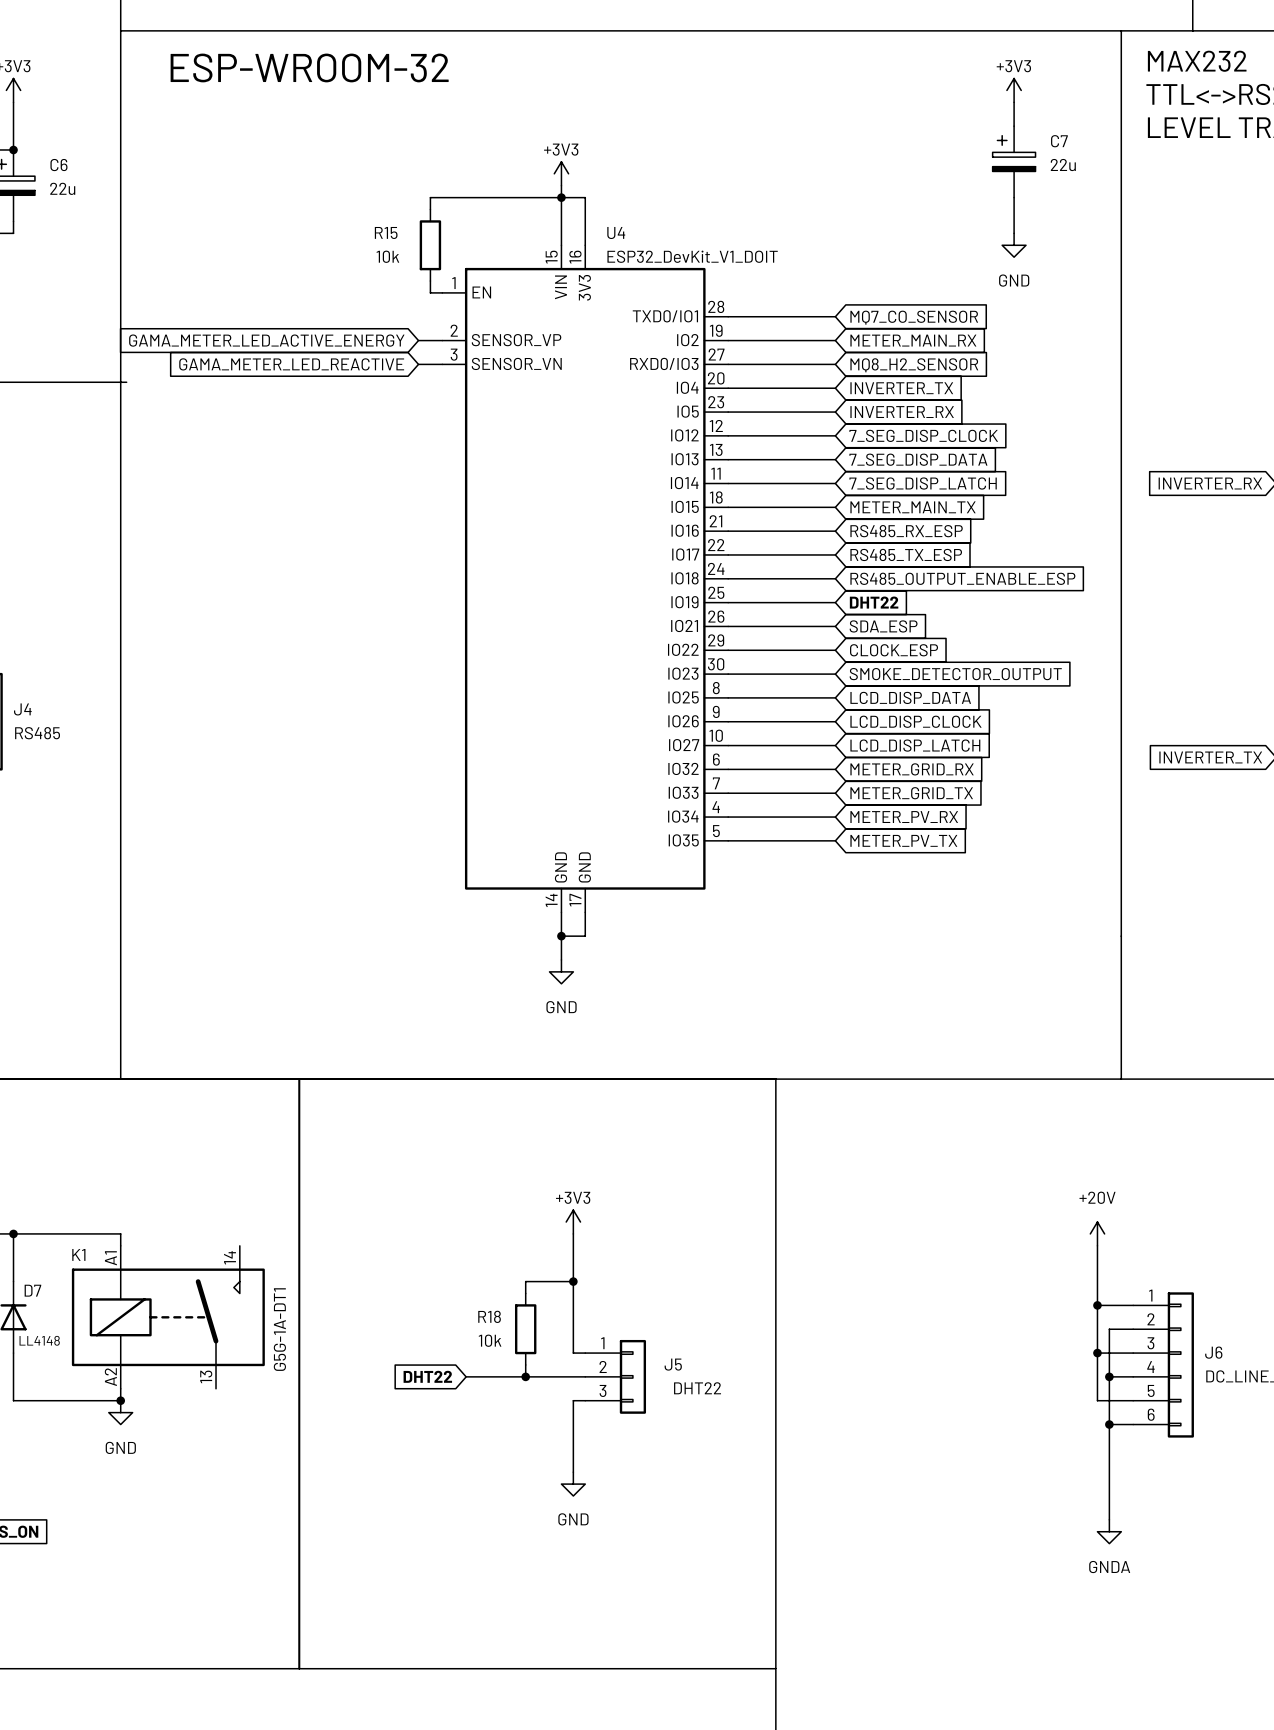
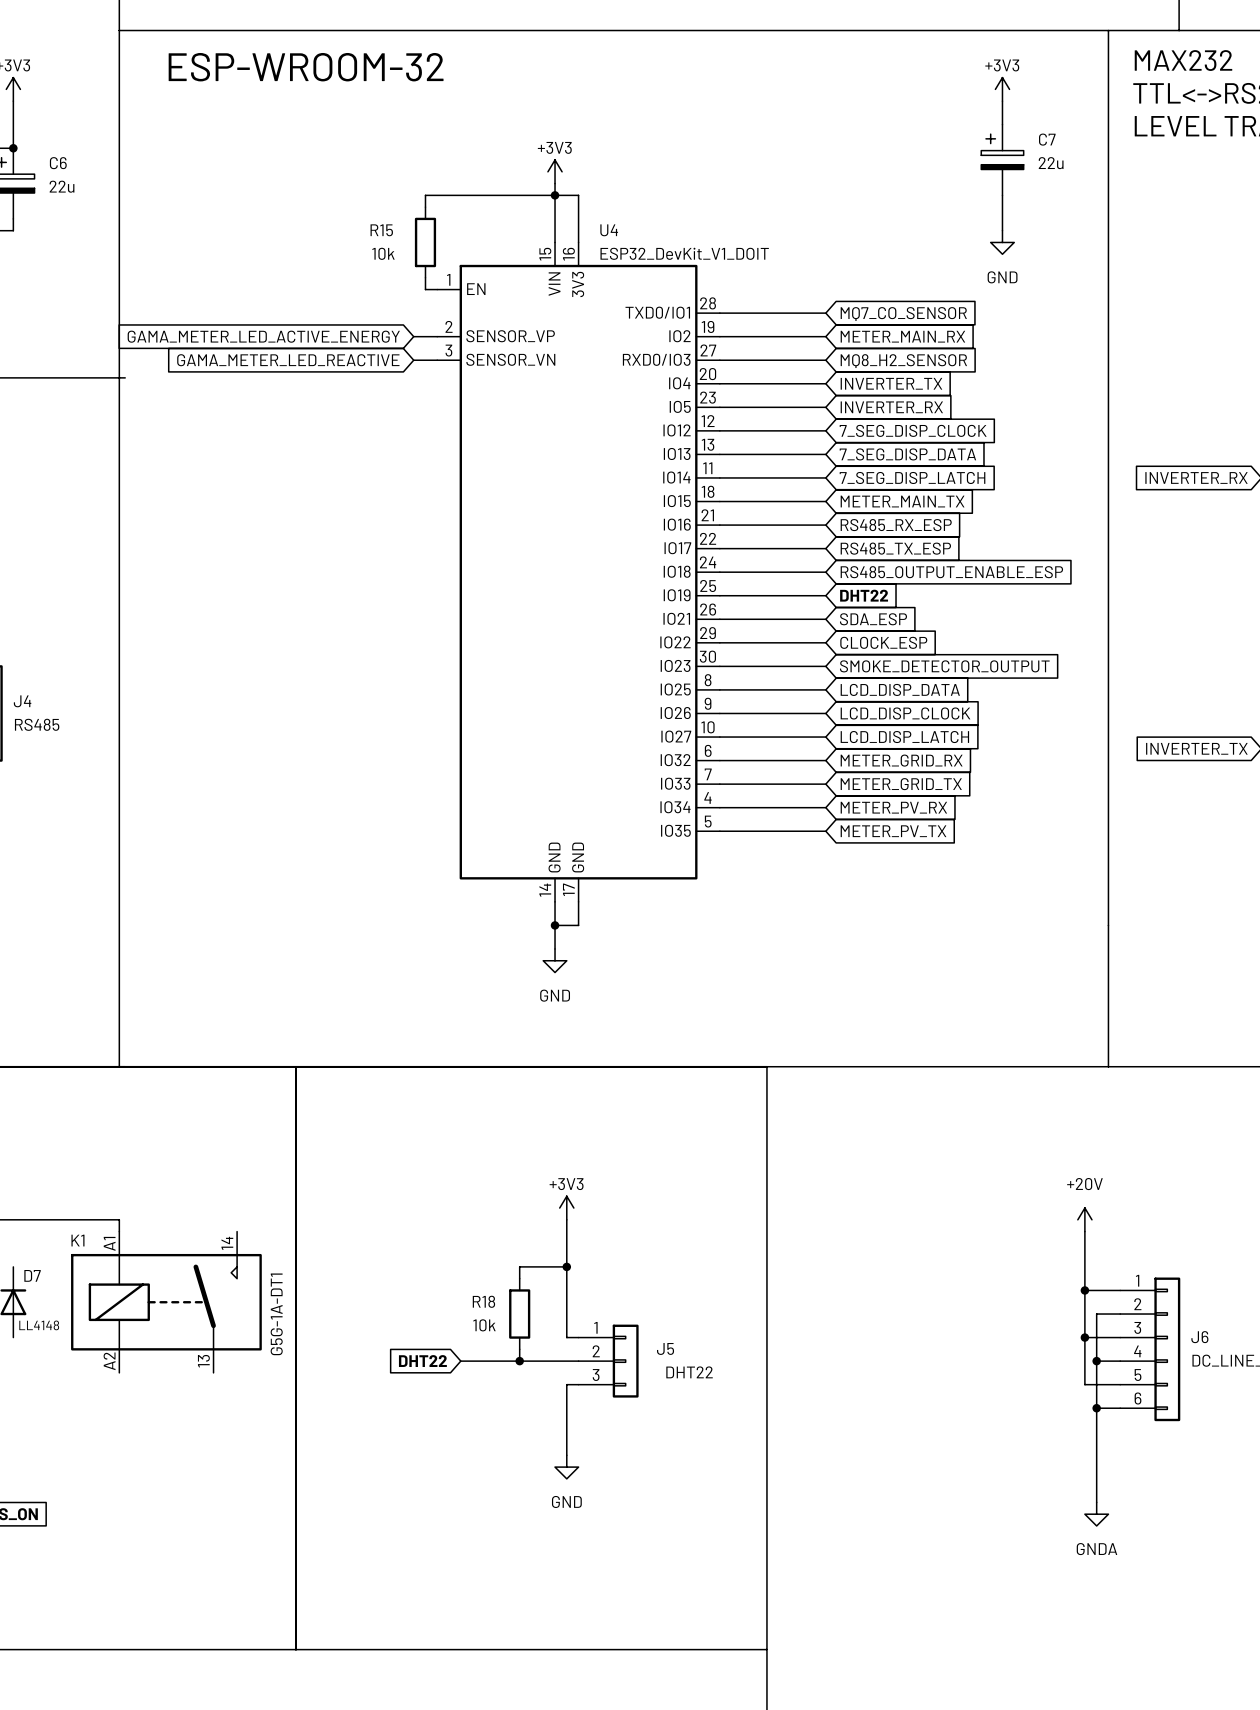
wire: (13, 1233) (13, 1281) -> none
junction: (13, 1233) -> none
wire: (13, 1353) (13, 1400) (120, 1400) (120, 1388) -> none
junction: (120, 1400) -> none
power symbol: GND (120, 1412) -> none

